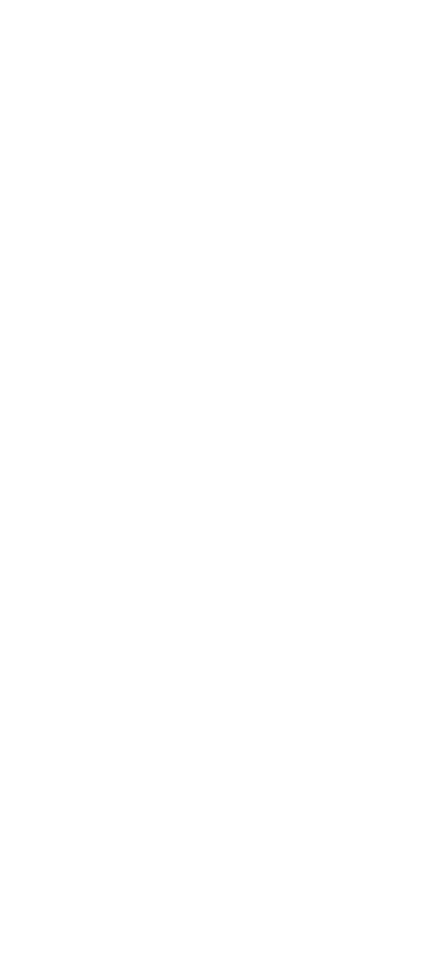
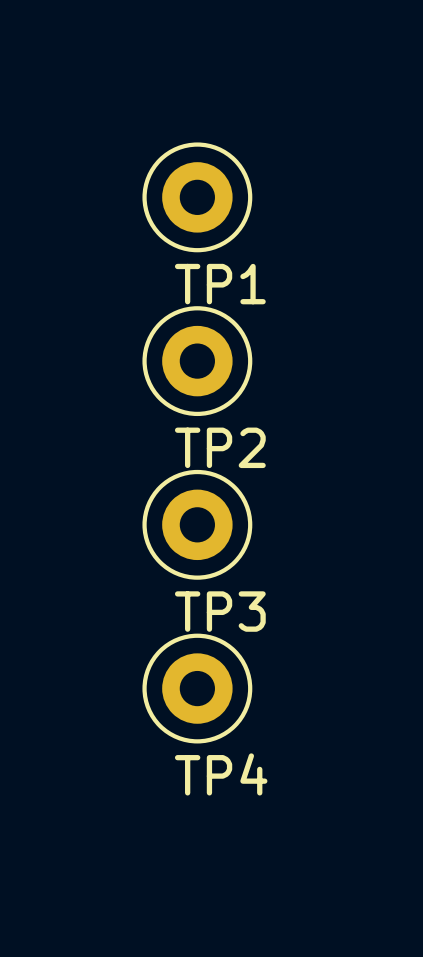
TP1: none -> (197, 197)
TP2: none -> (197, 361)
TP3: none -> (197, 524)
TP4: none -> (197, 688)

